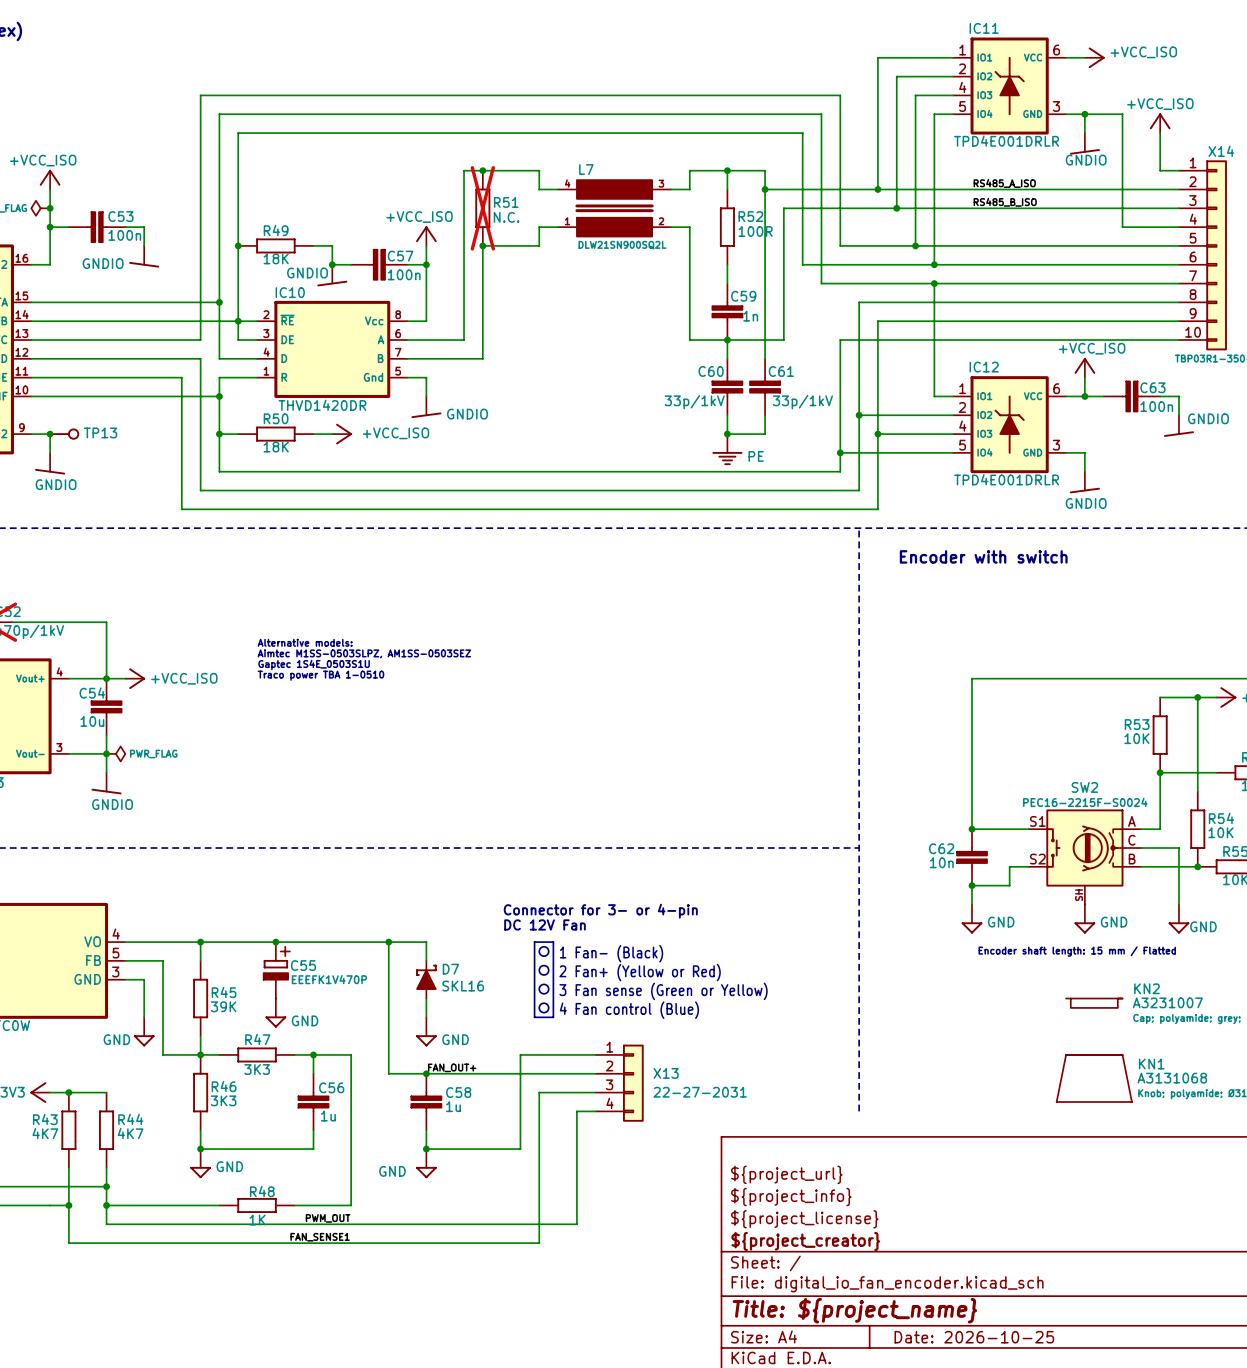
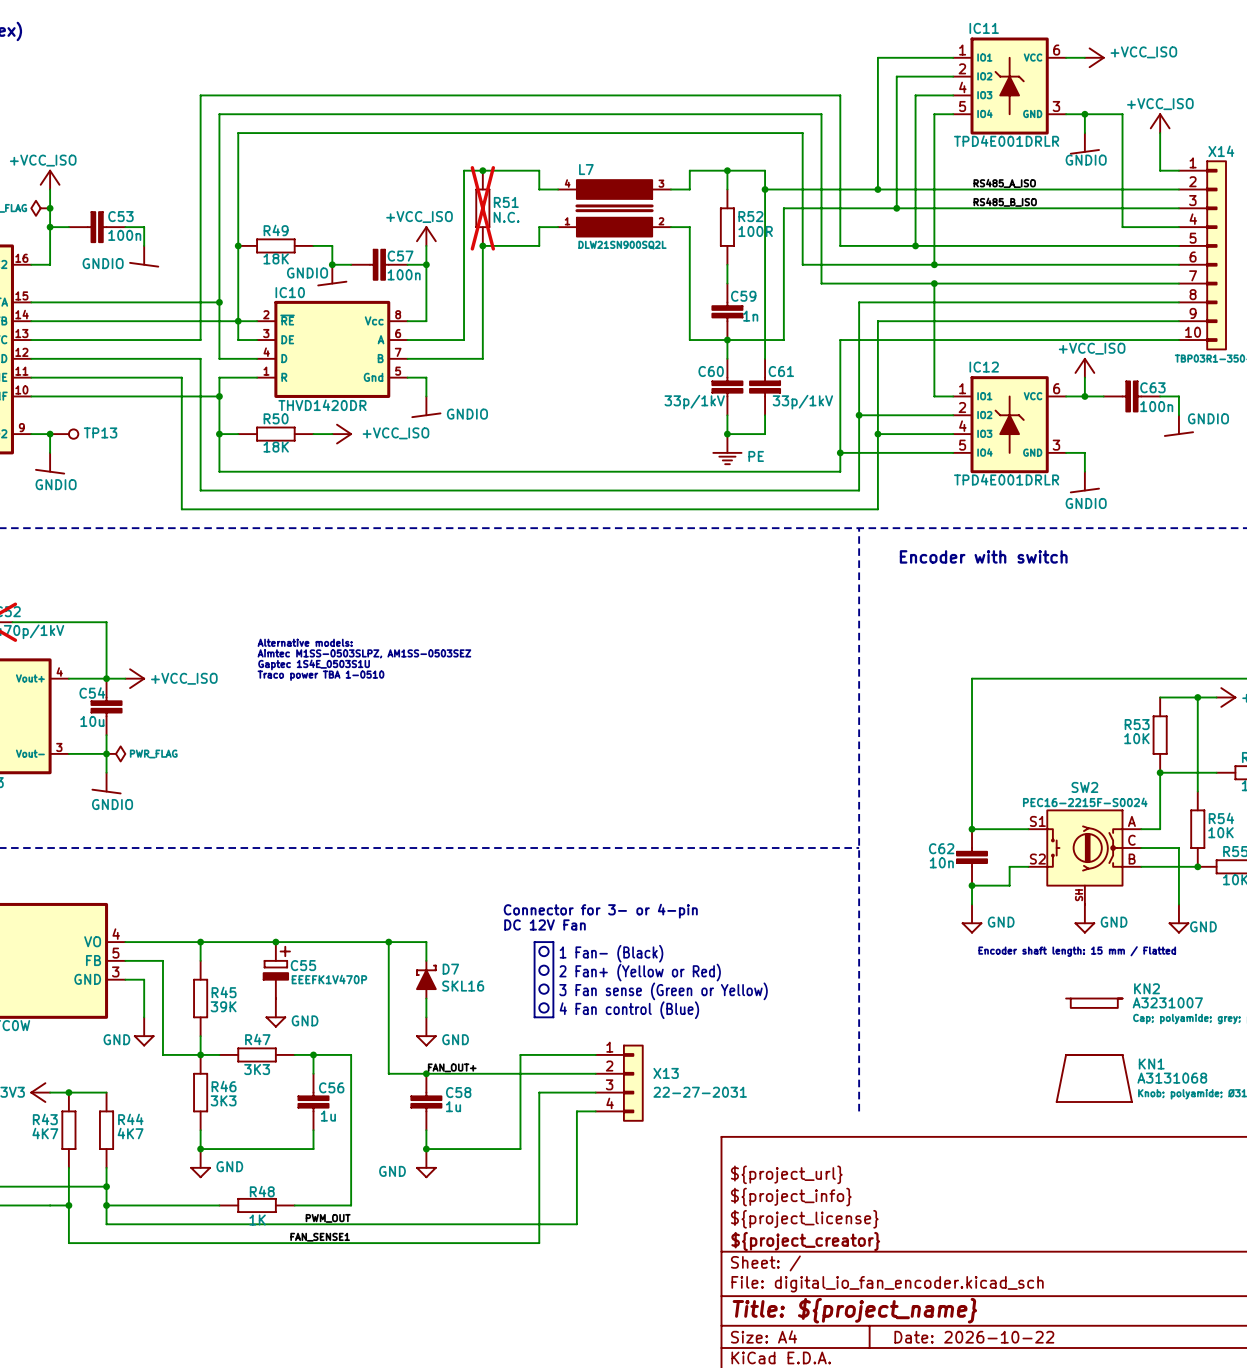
title block: Date: 2026-10-25 (974, 1337) -> Date: 2026-10-22 (974, 1337)

